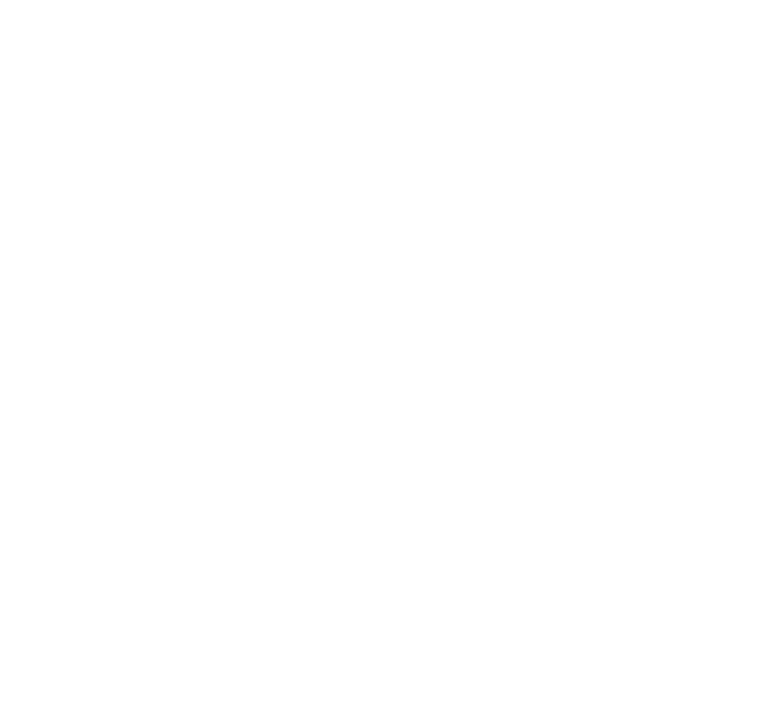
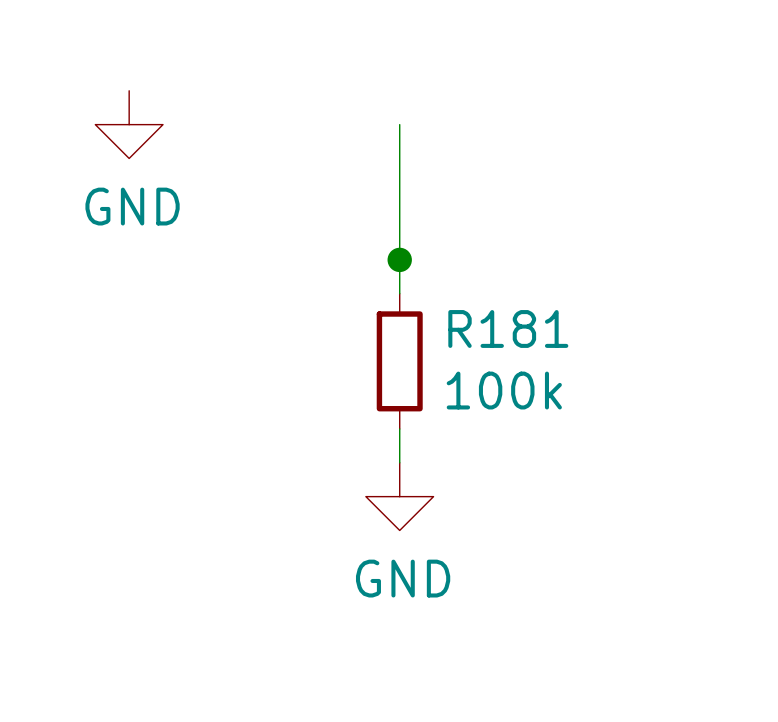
power symbol: none -> GND (129, 124)
wire: none -> (399, 124) (399, 293)
junction: none -> (399, 259)
R181: none -> 100k (399, 361)
wire: none -> (399, 429) (399, 462)
power symbol: none -> GND (399, 496)

